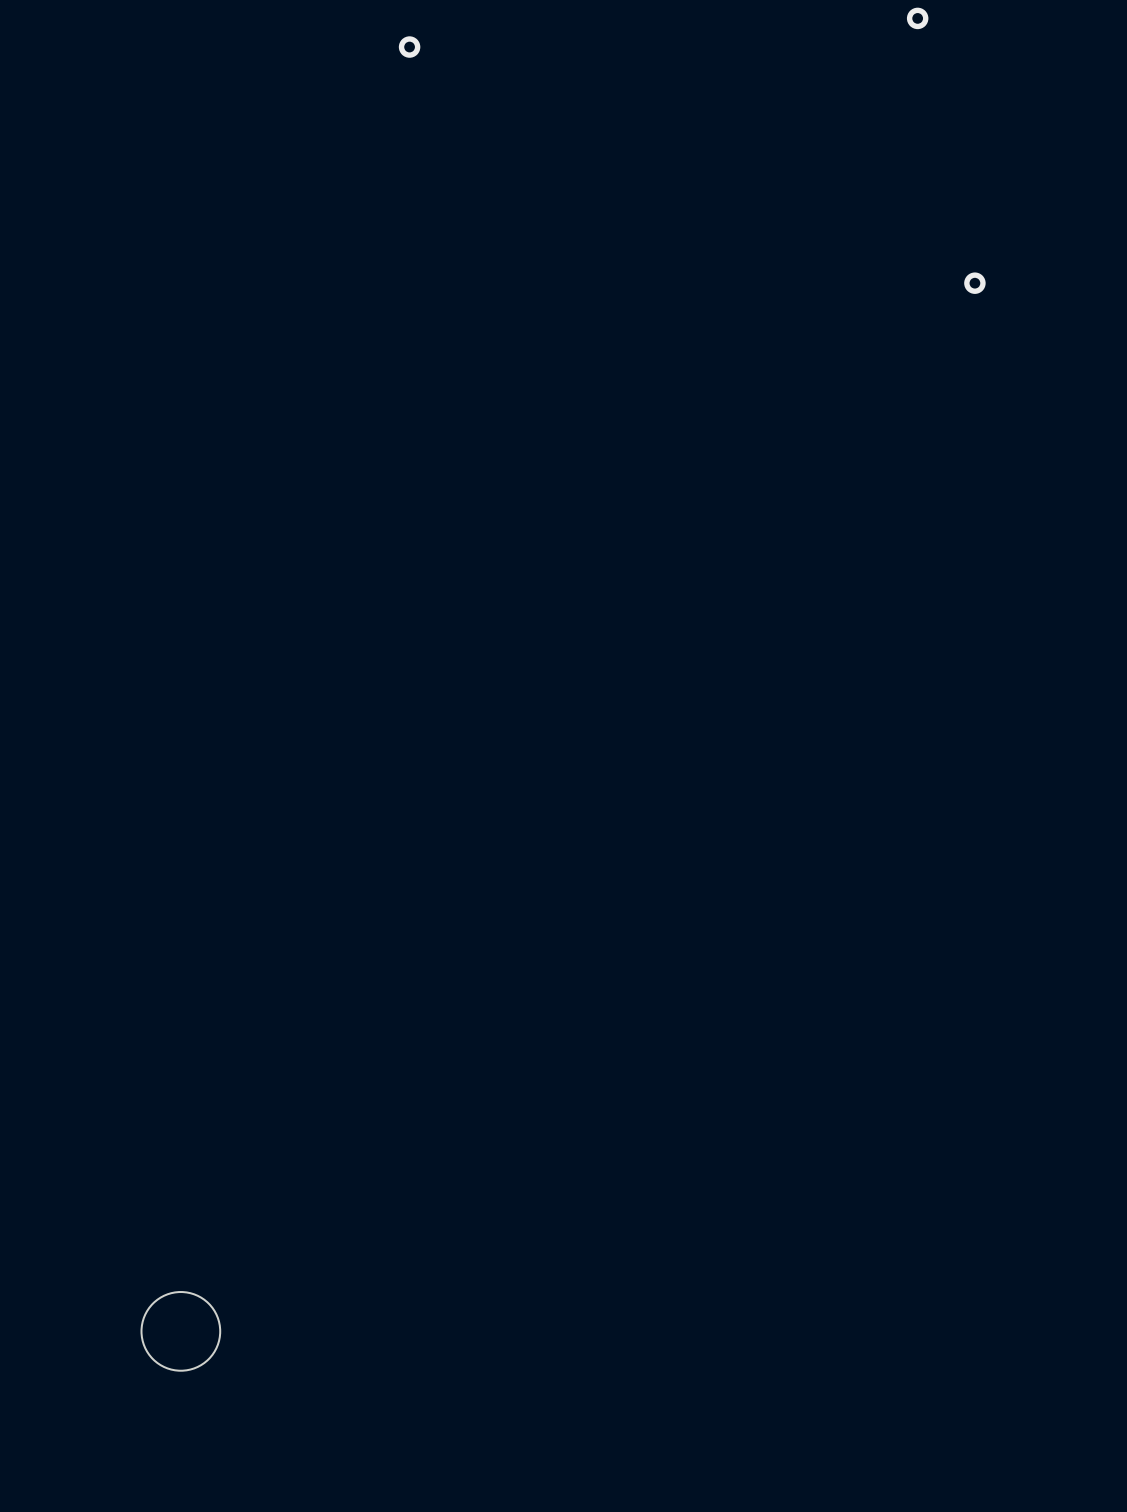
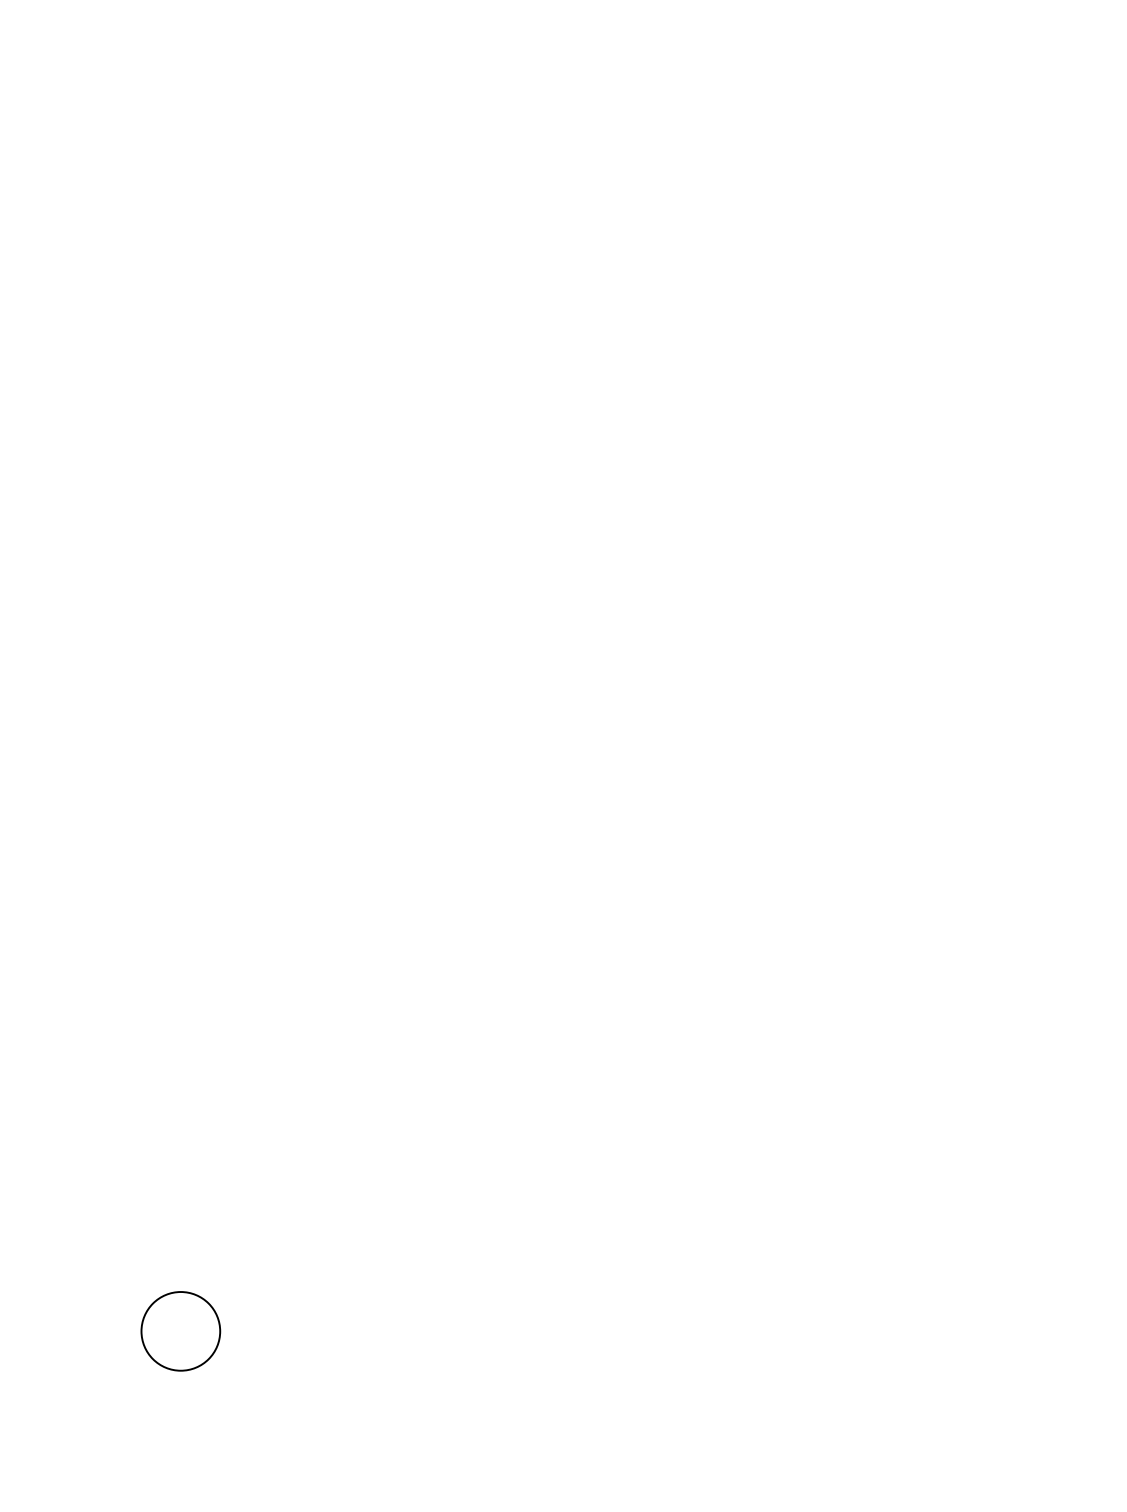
via: (917, 18) -> none
via: (409, 47) -> none
via: (974, 283) -> none

